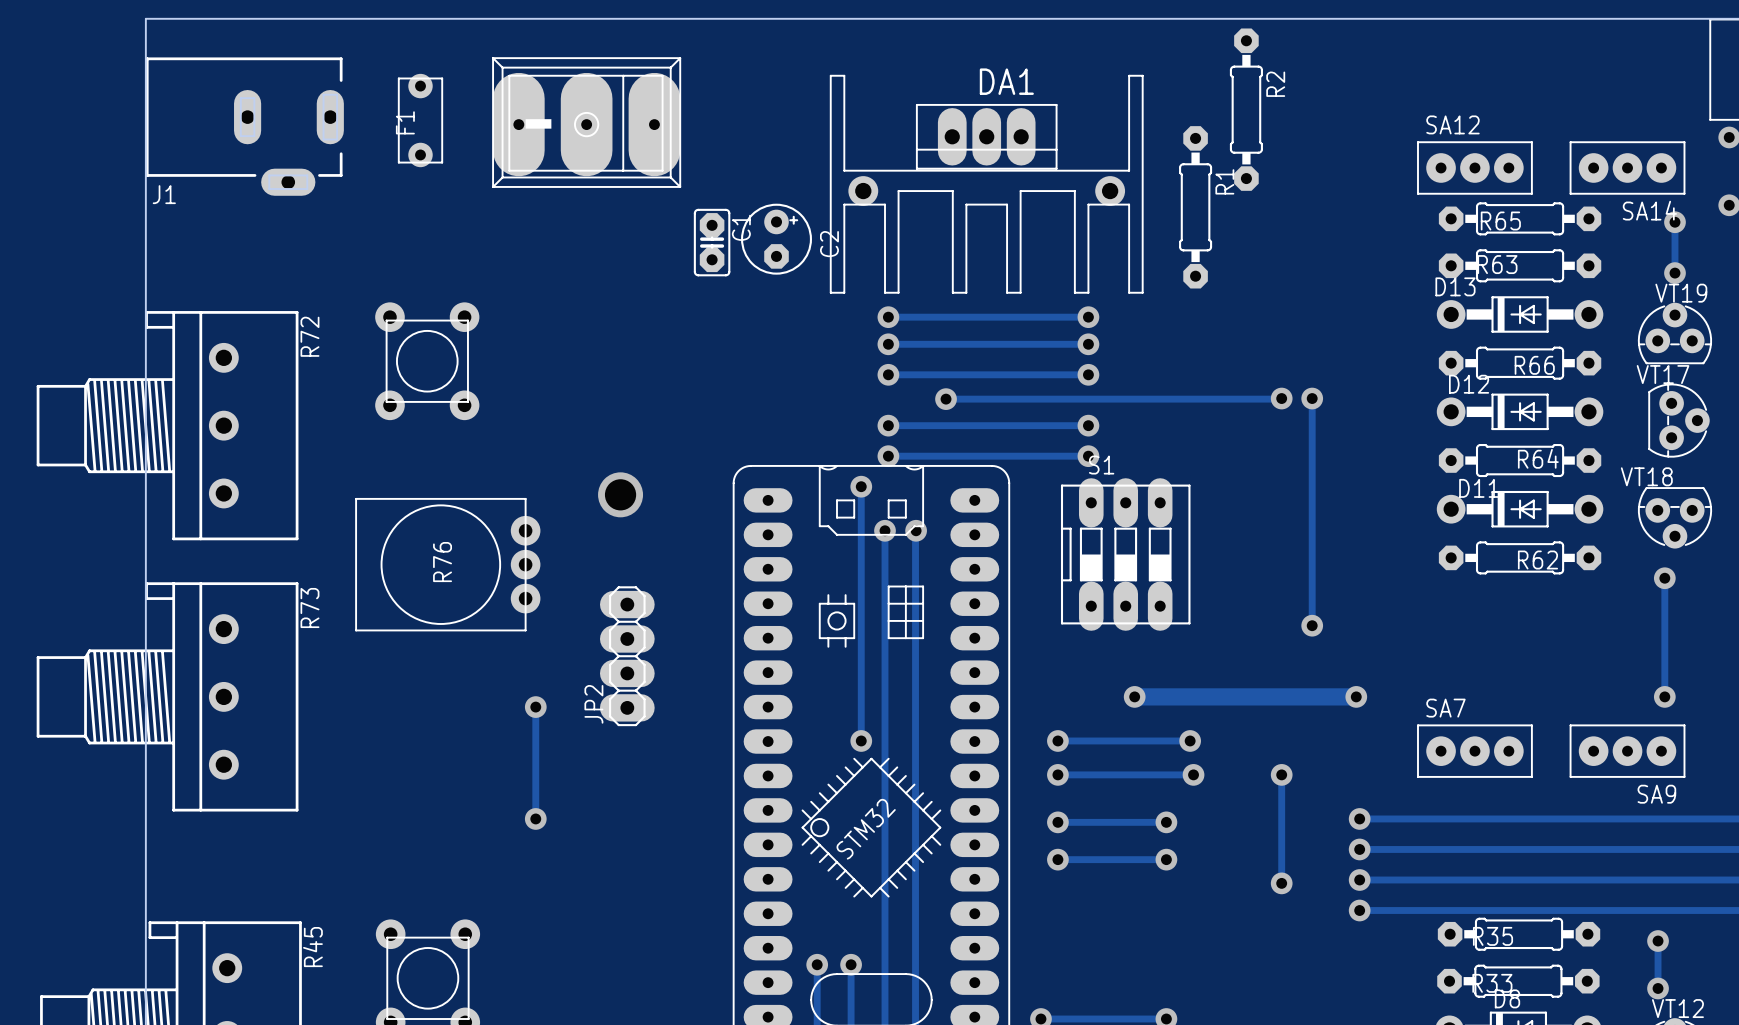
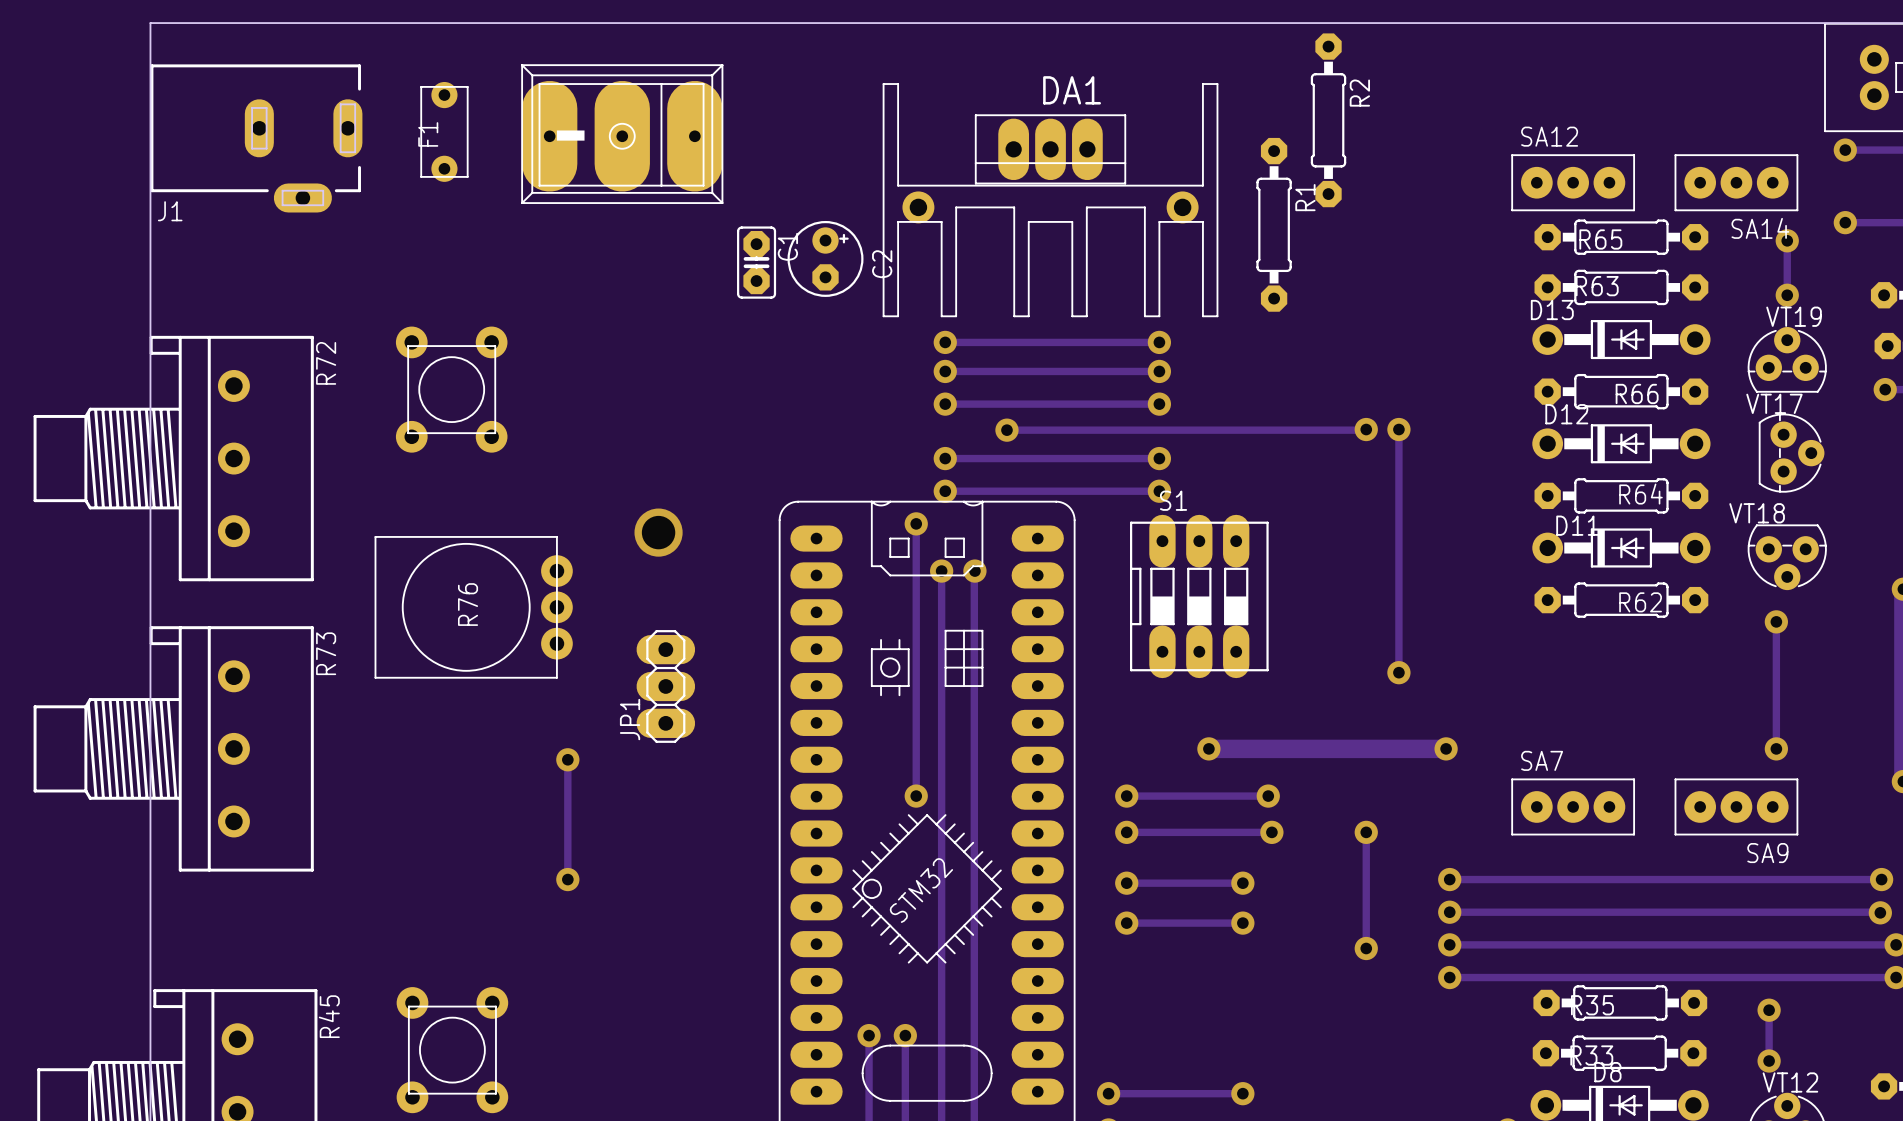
JP1: none -> (665, 686)
JP2: (627, 656) -> none

